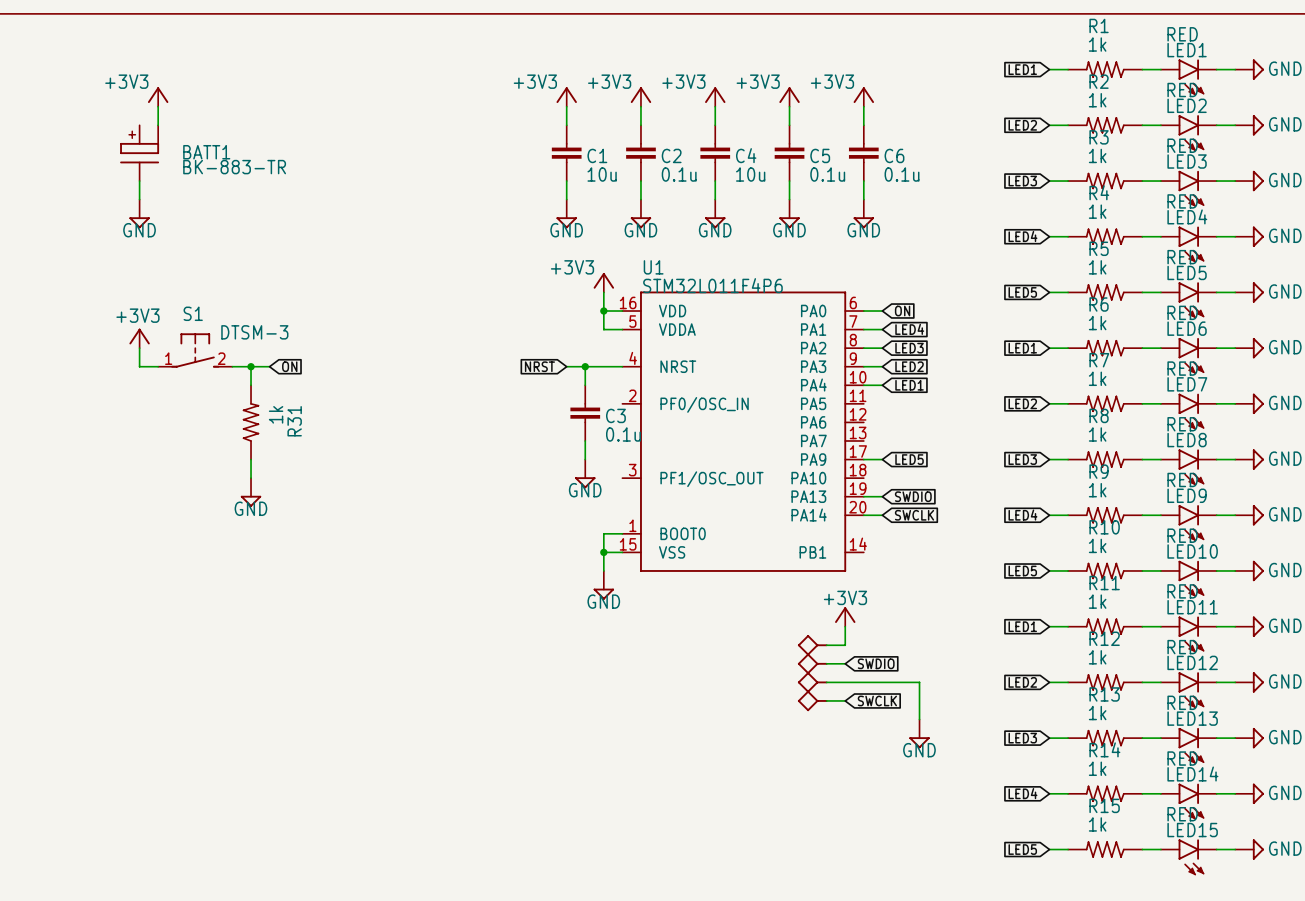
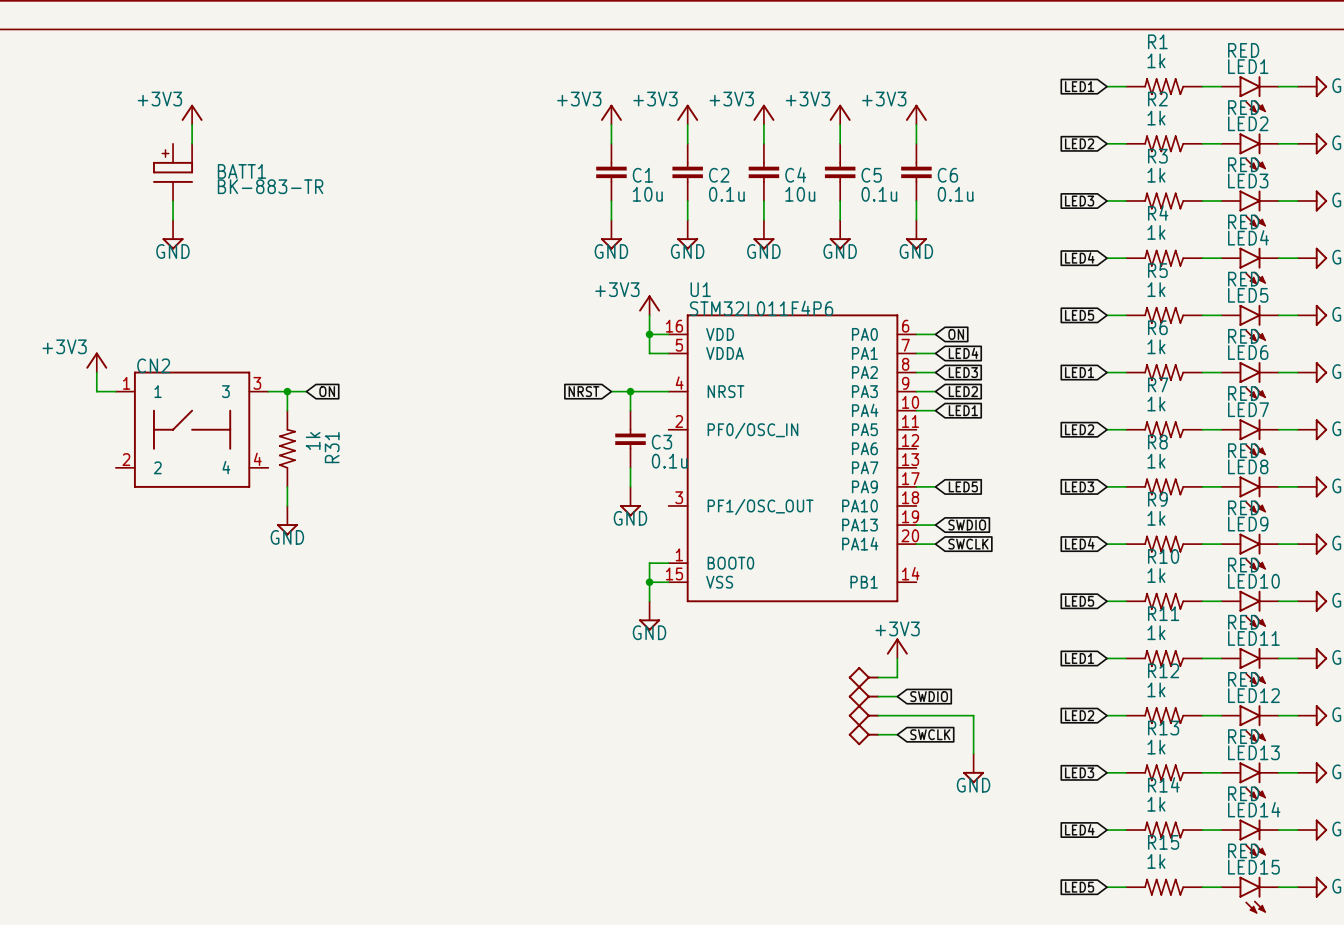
power symbol text position: +3V3 (137, 315) -> +3V3 (64, 346)
power symbol position: +3V3 (139, 338) -> +3V3 (96, 362)
wire: (139, 348) (139, 366) (158, 366) -> (96, 372) (96, 391) (115, 391)
S1: DTSM-3 (195, 350) -> none
CN2: none -> (192, 429)

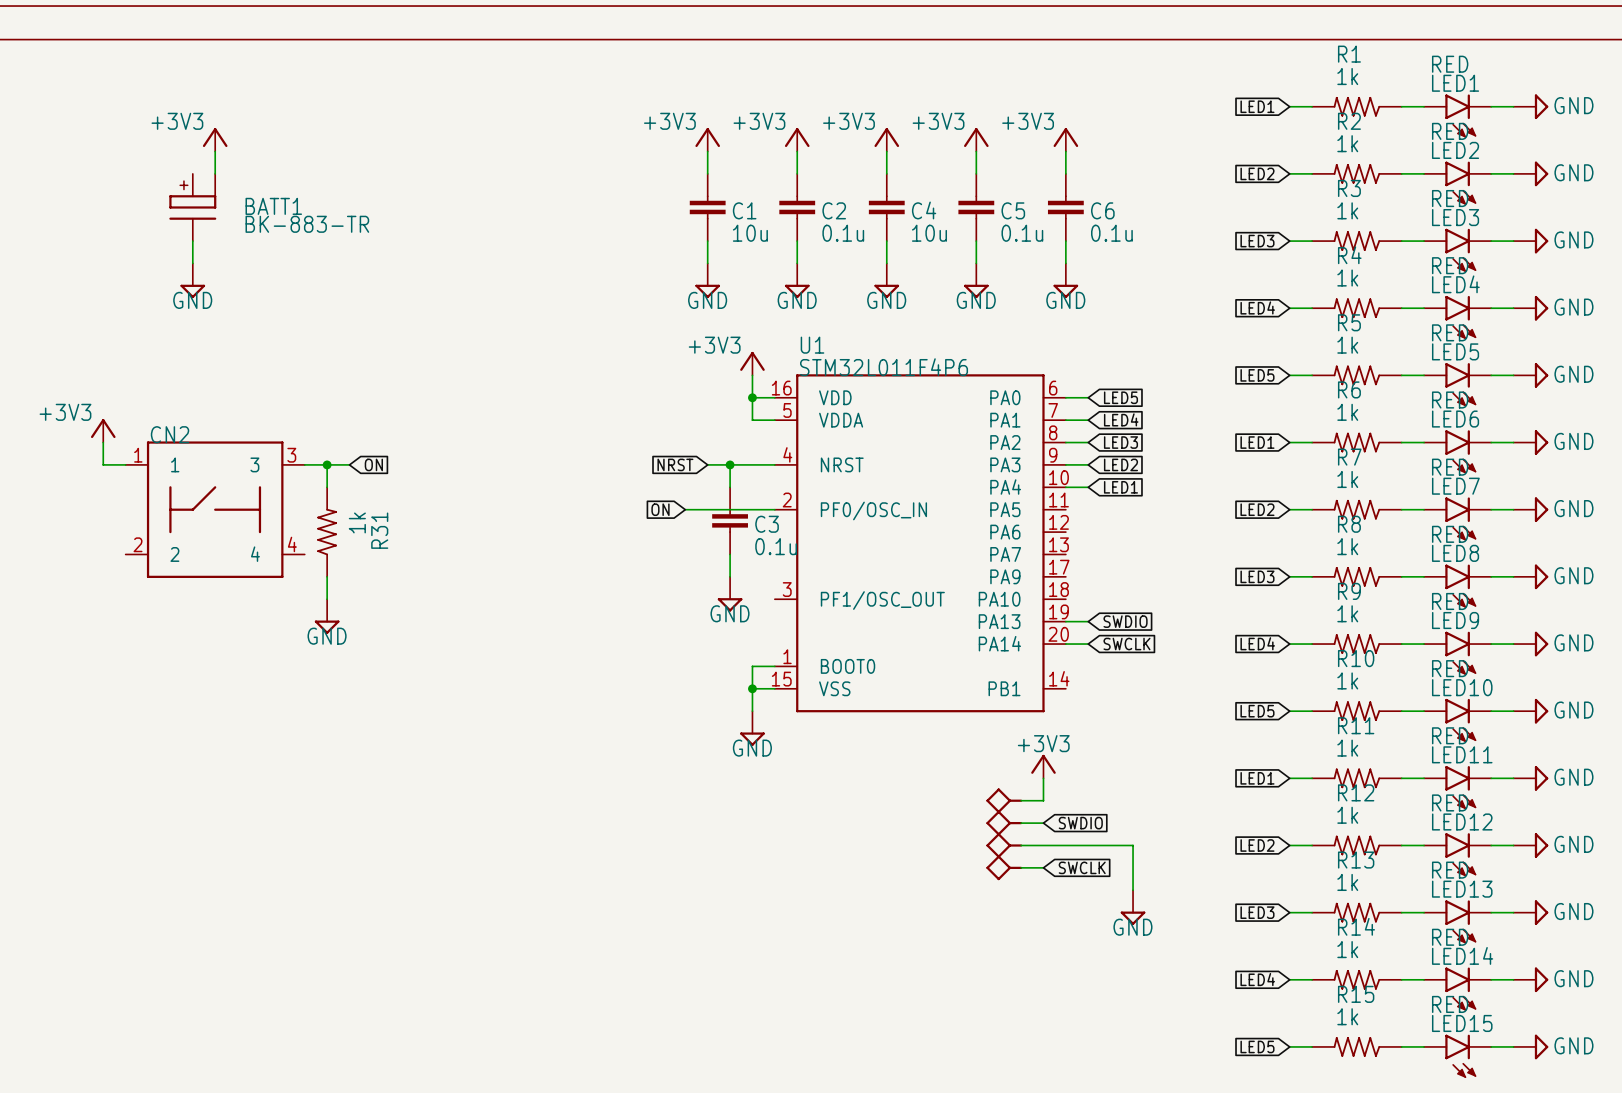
global label: ON (956, 334) -> LED5 (1120, 397)
global label: none -> ON (660, 509)
wire: none -> (685, 509) (774, 509)
wire: (916, 486) (935, 486) -> none
global label: LED5 (963, 486) -> none

